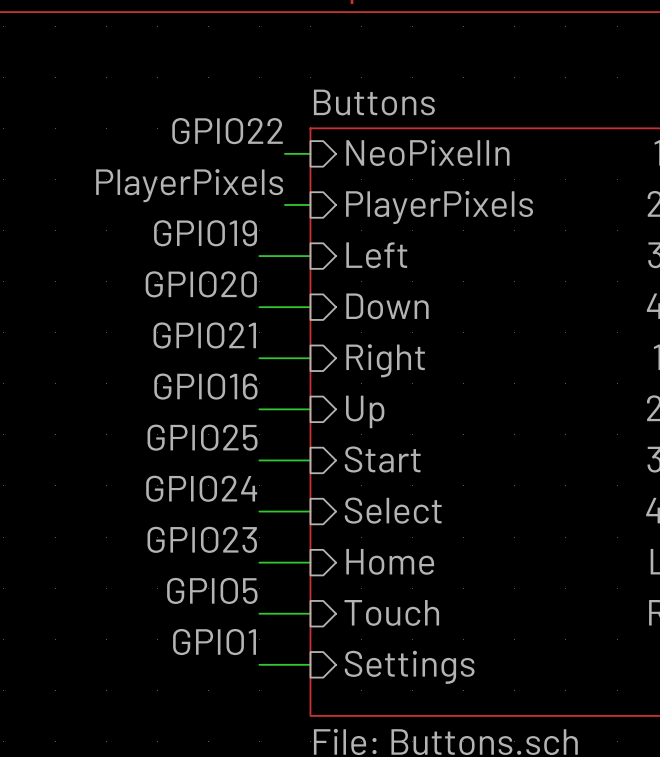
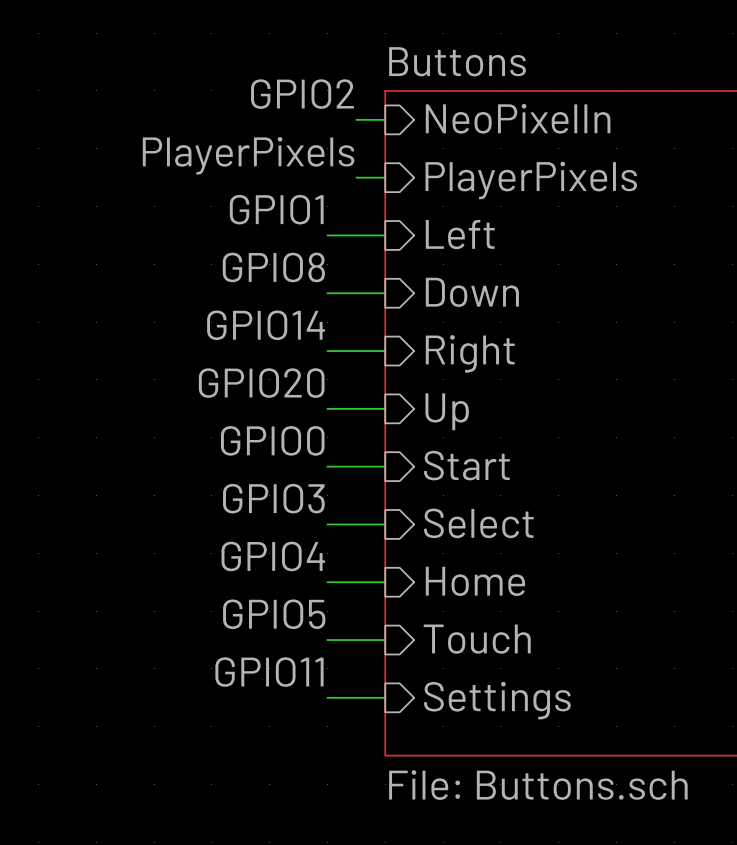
label: GPIO22 (227, 131) -> GPIO2 (302, 94)
label: GPIO19 (205, 233) -> GPIO1 (276, 209)
label: GPIO20 (201, 284) -> GPIO8 (273, 267)
label: GPIO21 (204, 335) -> GPIO14 (266, 325)
label: GPIO16 (205, 386) -> GPIO20 (261, 383)
label: GPIO25 (202, 437) -> GPIO0 (272, 440)
label: GPIO24 (201, 488) -> GPIO3 (273, 498)
label: GPIO23 (202, 539) -> GPIO4 (273, 556)
label: GPIO1 (214, 642) -> GPIO11 (269, 672)

